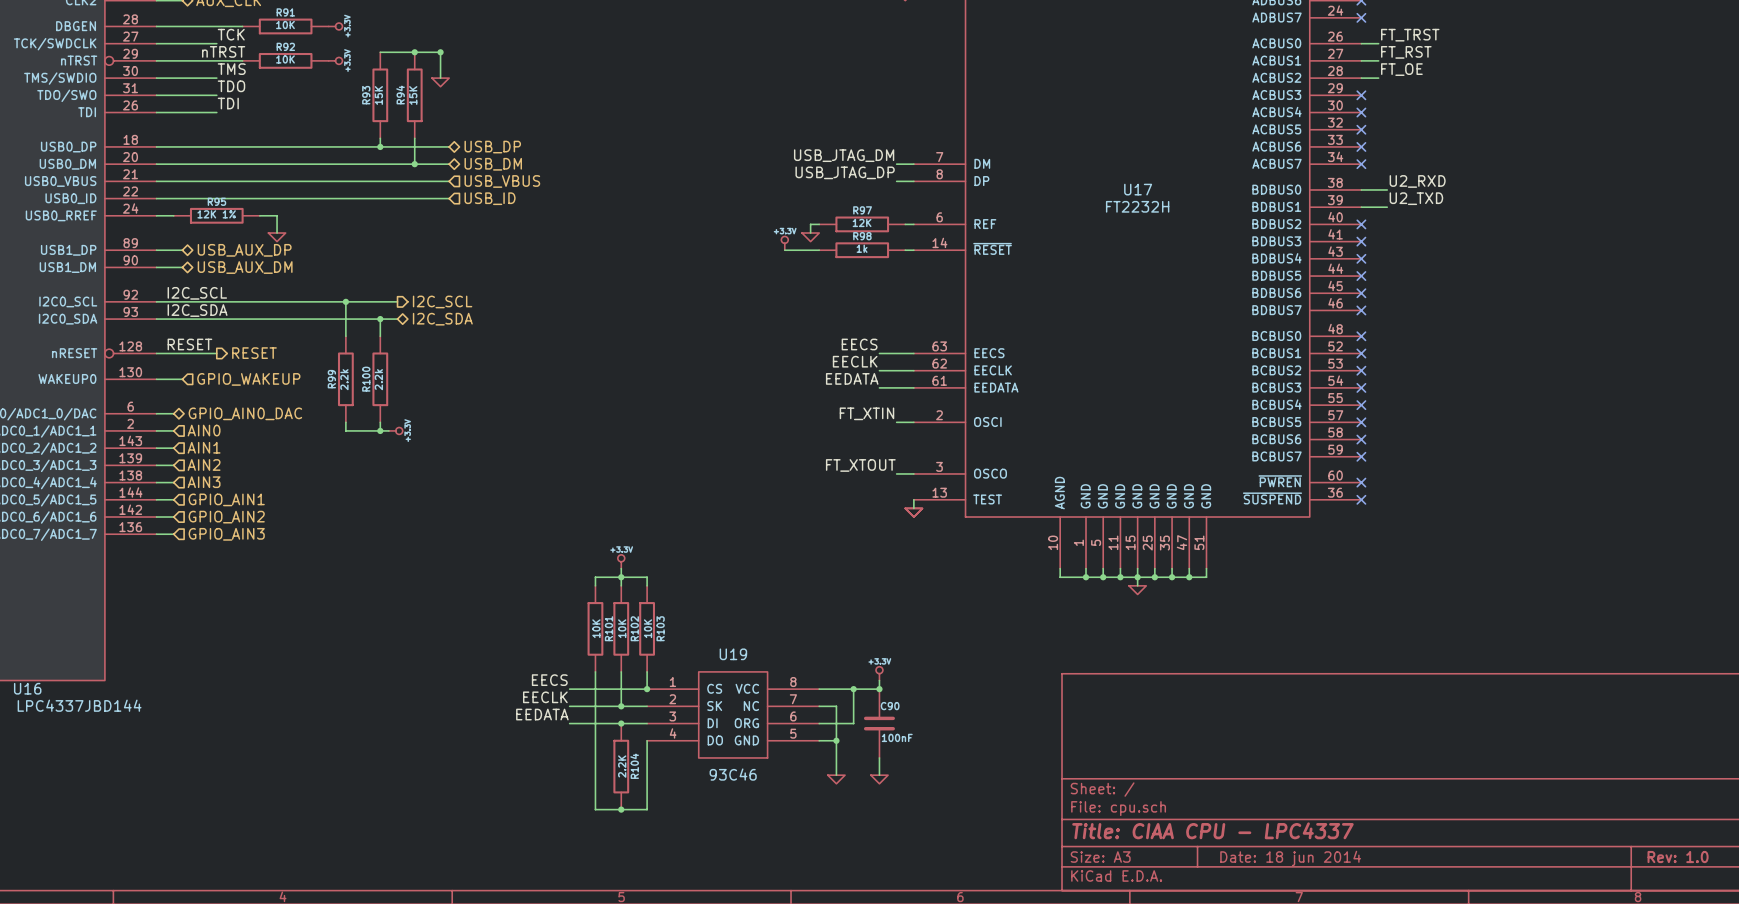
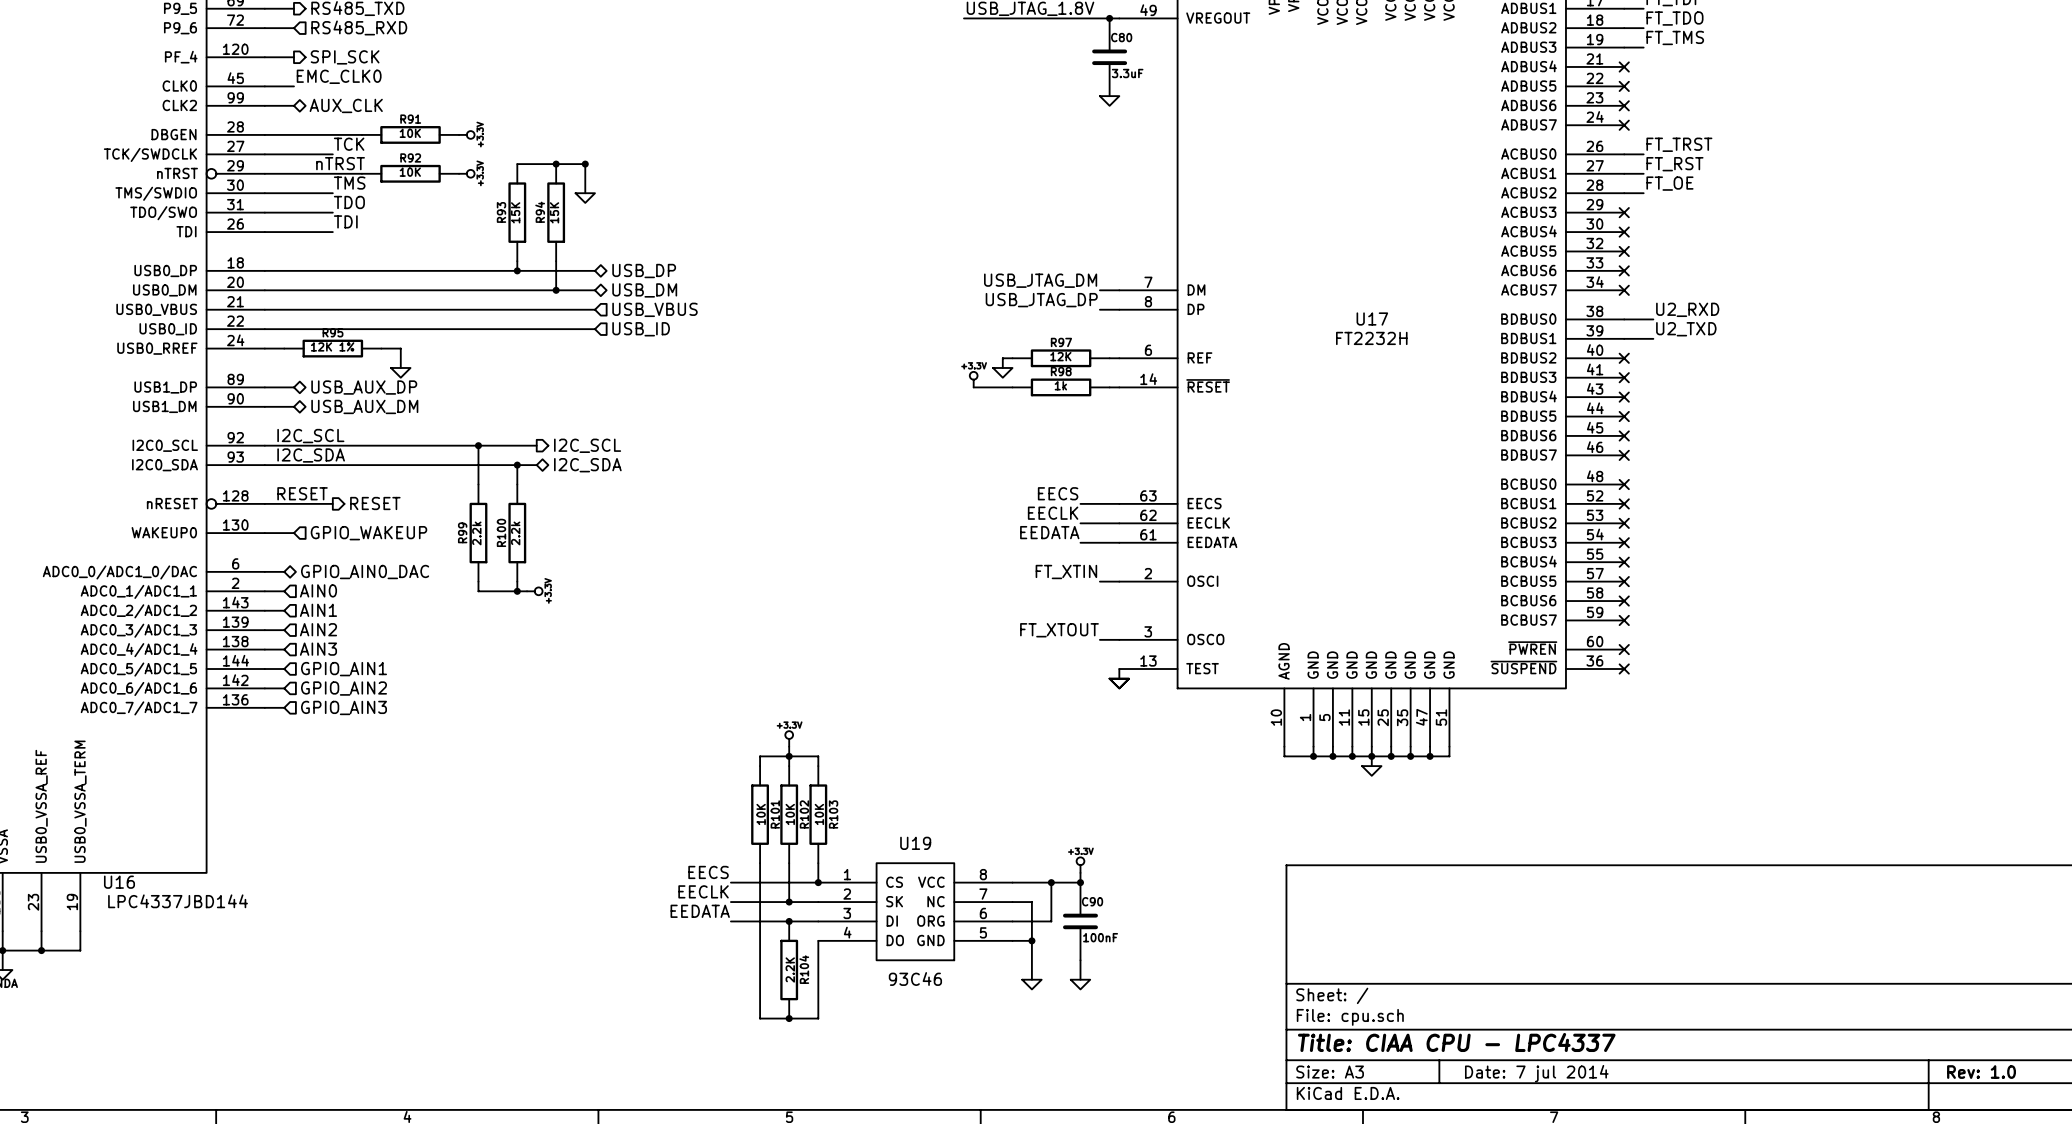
title block: Date: 18 jun 2014 (1290, 858) -> Date: 7 jul 2014 (1536, 1073)

